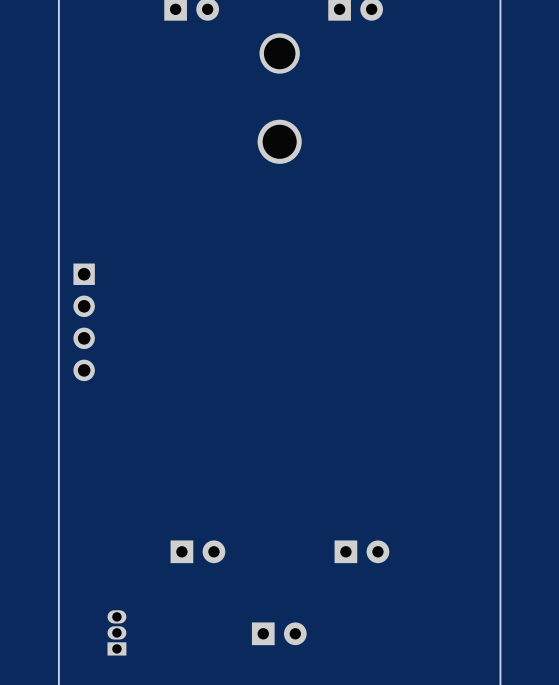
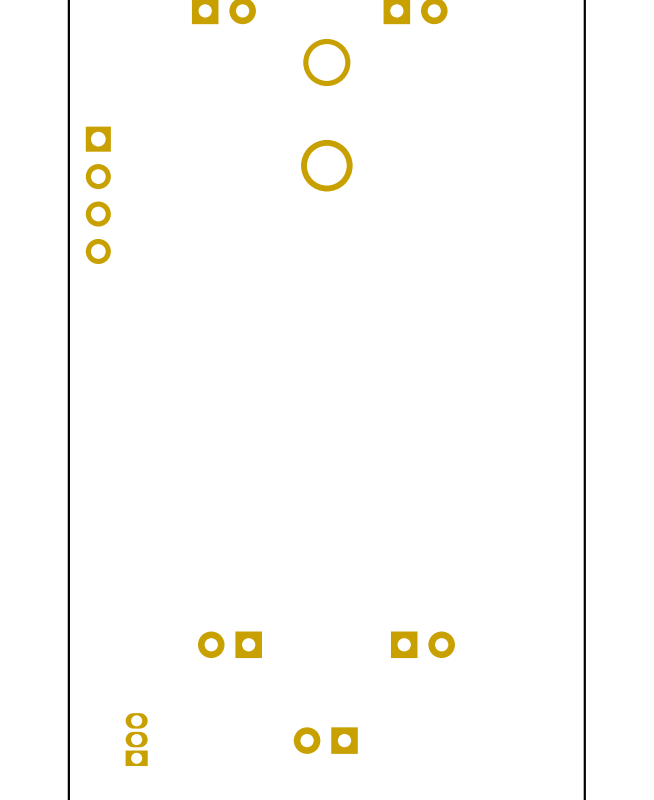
part position: (84, 322) -> (98, 195)
part rotation: 0° (197, 551) -> 180° (229, 644)
part rotation: 0° (279, 633) -> 180° (325, 740)

